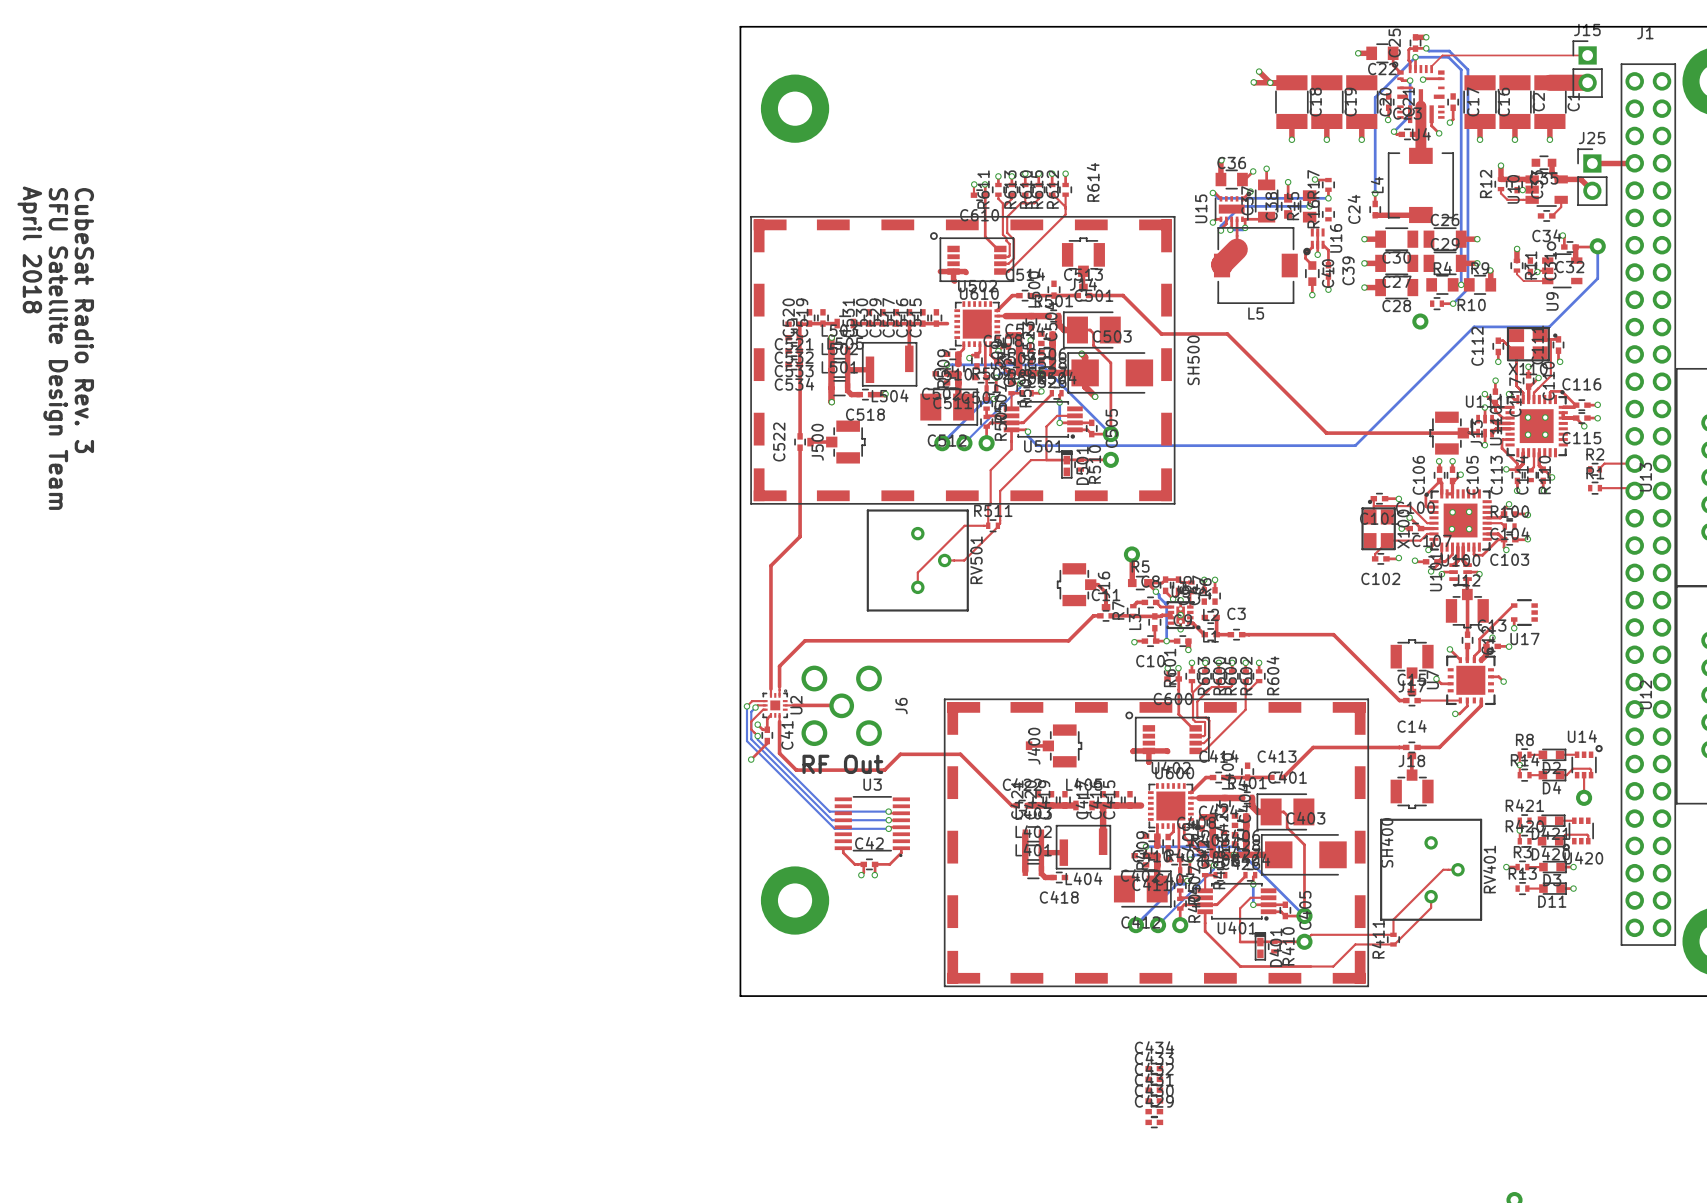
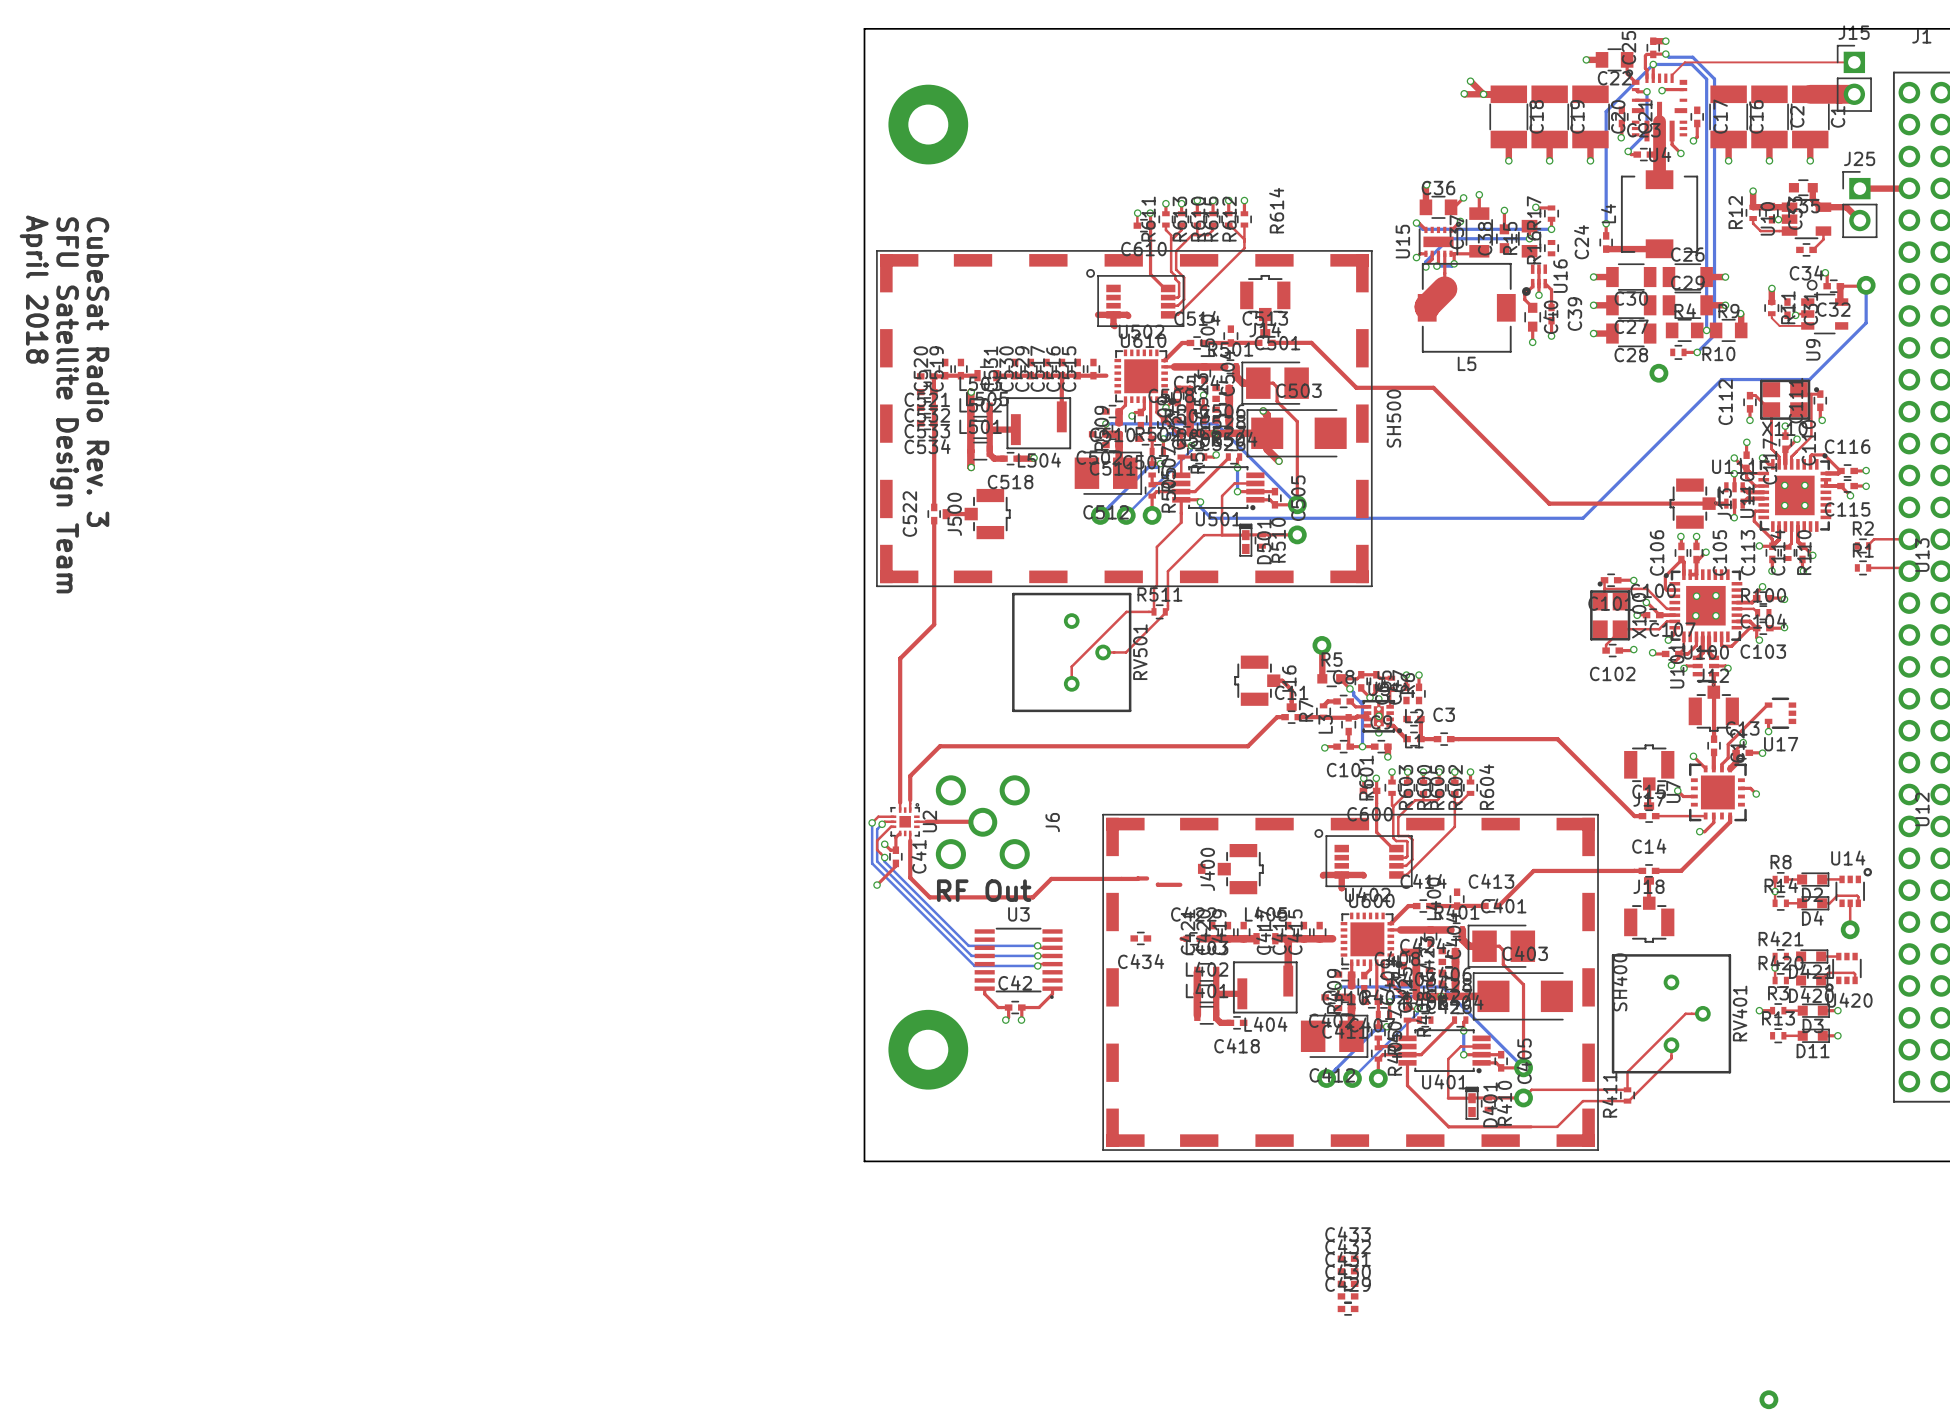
top track: (1029, 745) (1048, 745) -> (1157, 884) (1180, 884)
top track: (960, 754) (1011, 805) -> (1121, 878) (1147, 878)
C434 name position: C434 (1154, 1047) -> C434 (1141, 961)
C434 position: (1154, 1068) -> (1140, 938)

